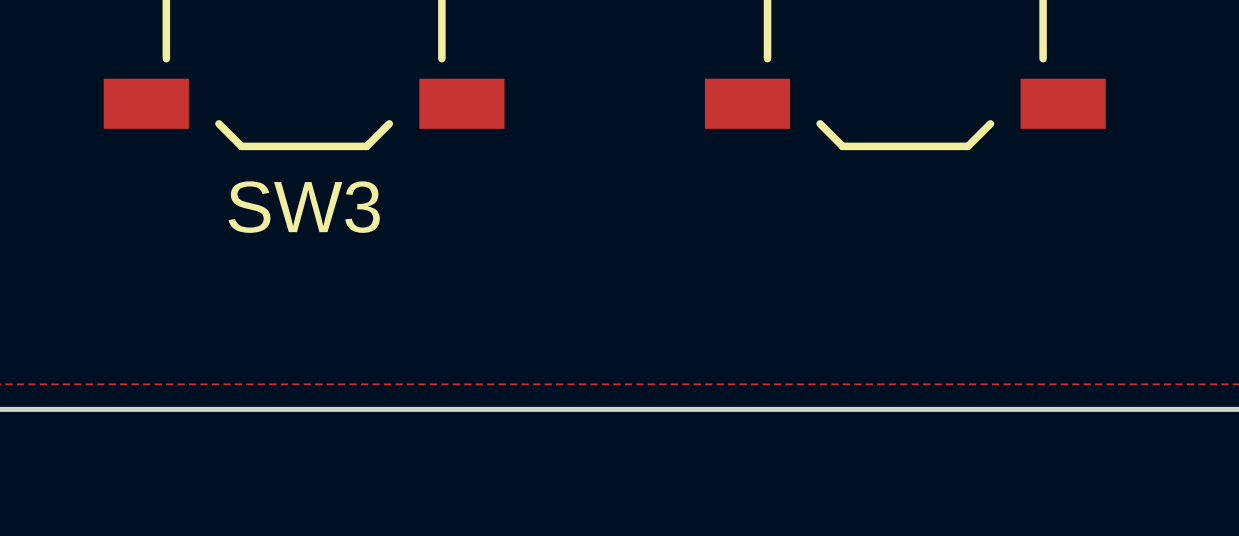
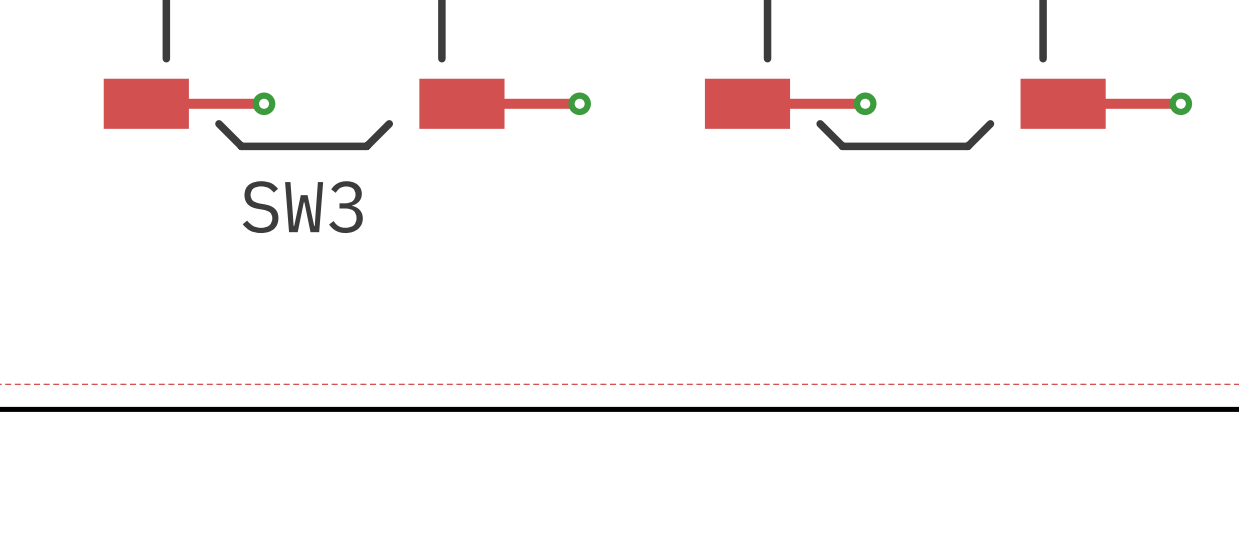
track: none -> (146, 103) (264, 103)
via: none -> (264, 103)
track: none -> (461, 103) (579, 103)
via: none -> (579, 103)
track: none -> (747, 103) (865, 103)
via: none -> (865, 103)
track: none -> (1063, 103) (1180, 103)
via: none -> (1180, 103)

